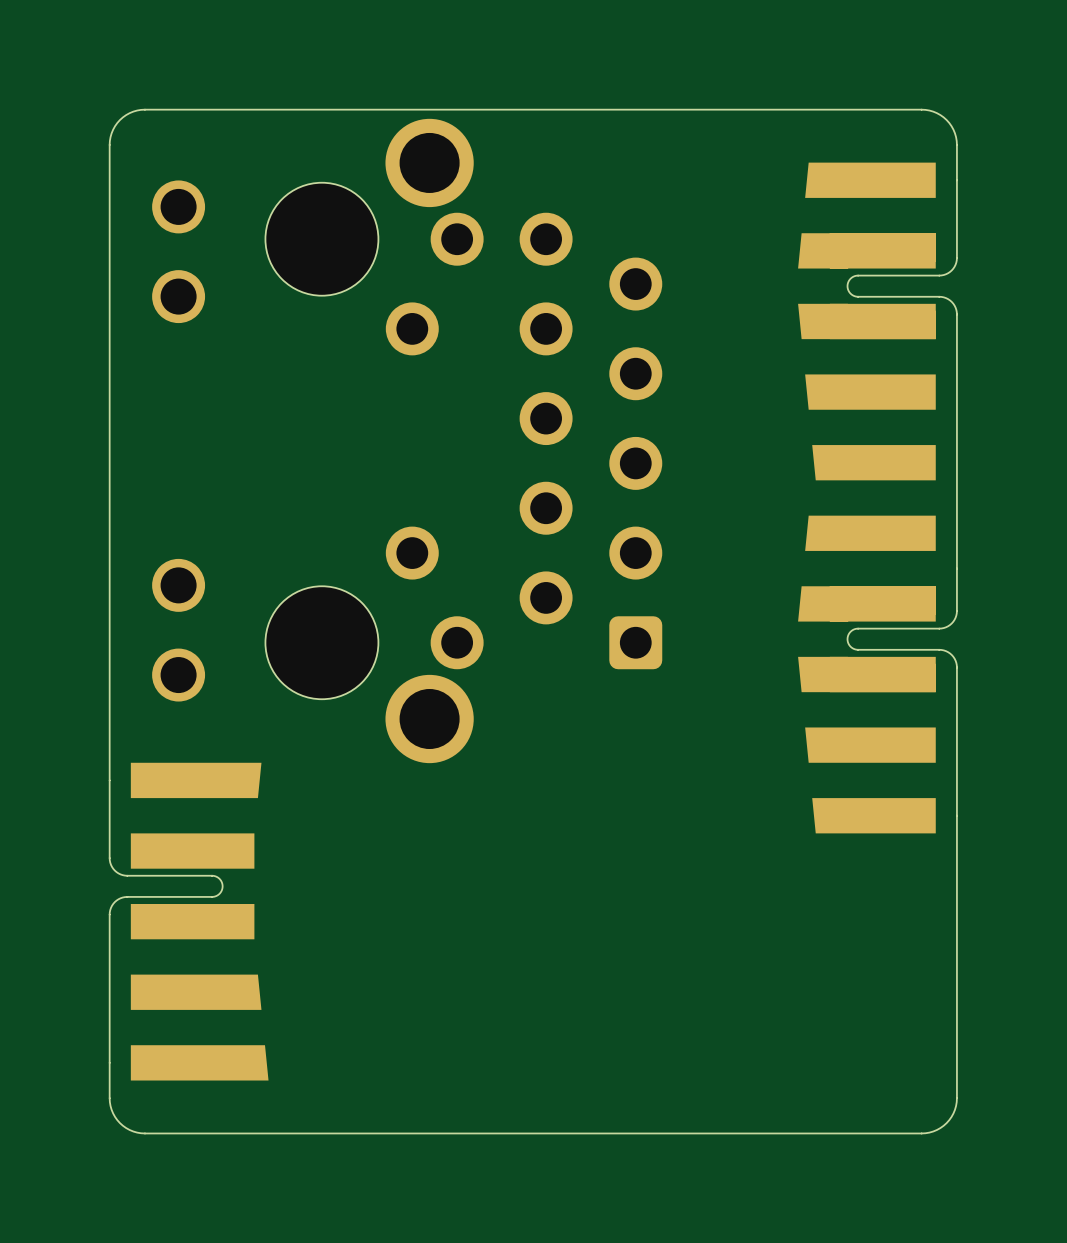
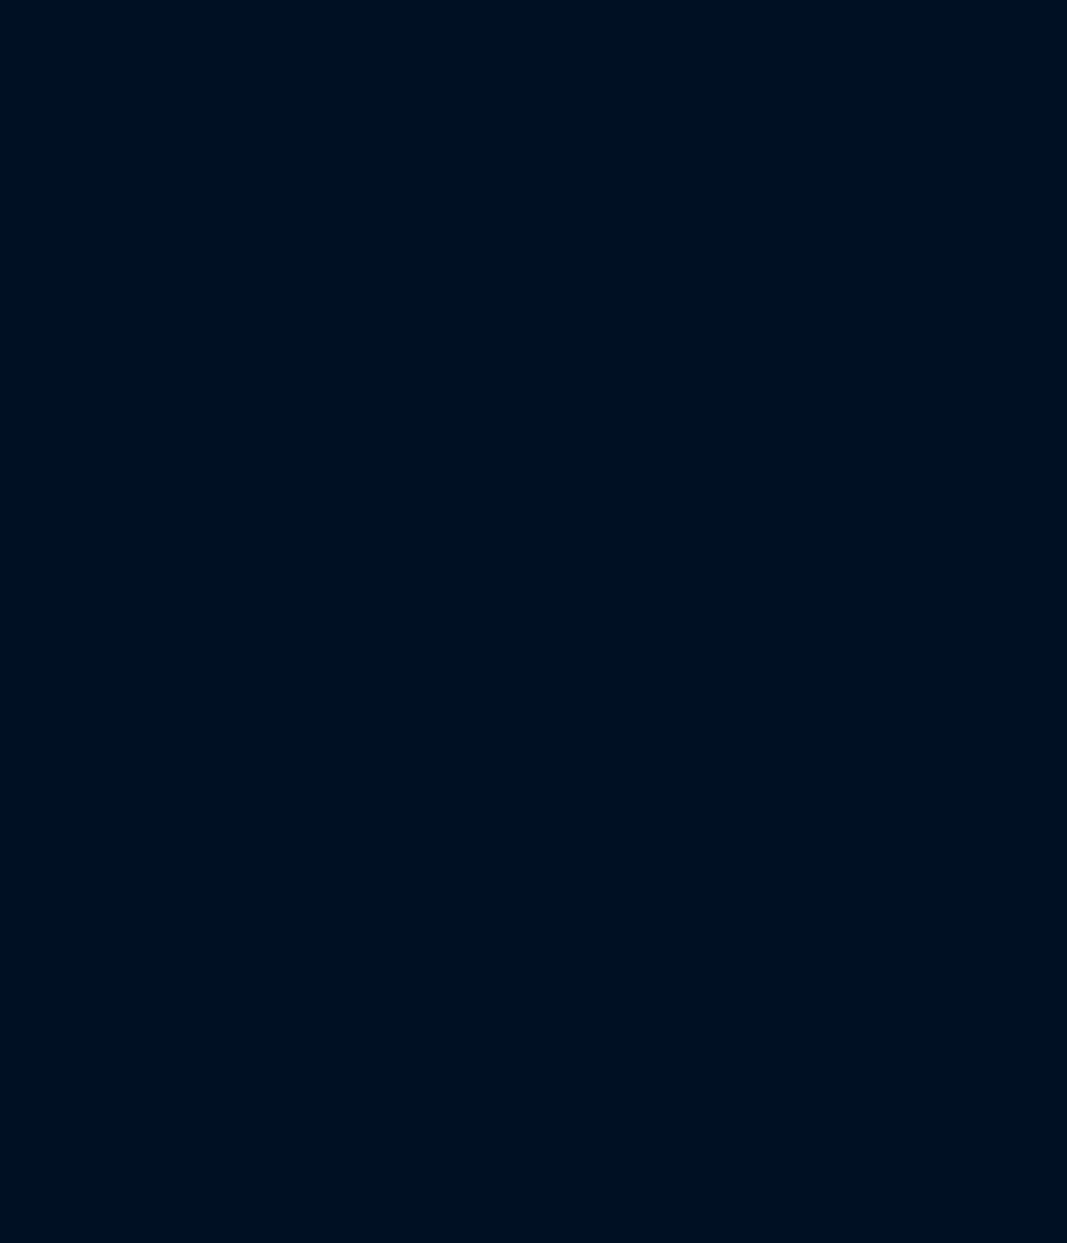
board edge: (956, 180) (956, 141) (953, 129) (943, 117) (925, 109) (144, 109) (126, 115) (115, 126) (109, 144) (109, 780) -> none
part: (407, 440) -> none
part: (877, 498) -> none
board edge: (956, 815) (956, 1102) (949, 1120) (933, 1131) (921, 1133) (141, 1133) (126, 1128) (113, 1113) (109, 1102) (109, 1062) -> none
part: (188, 921) -> none

